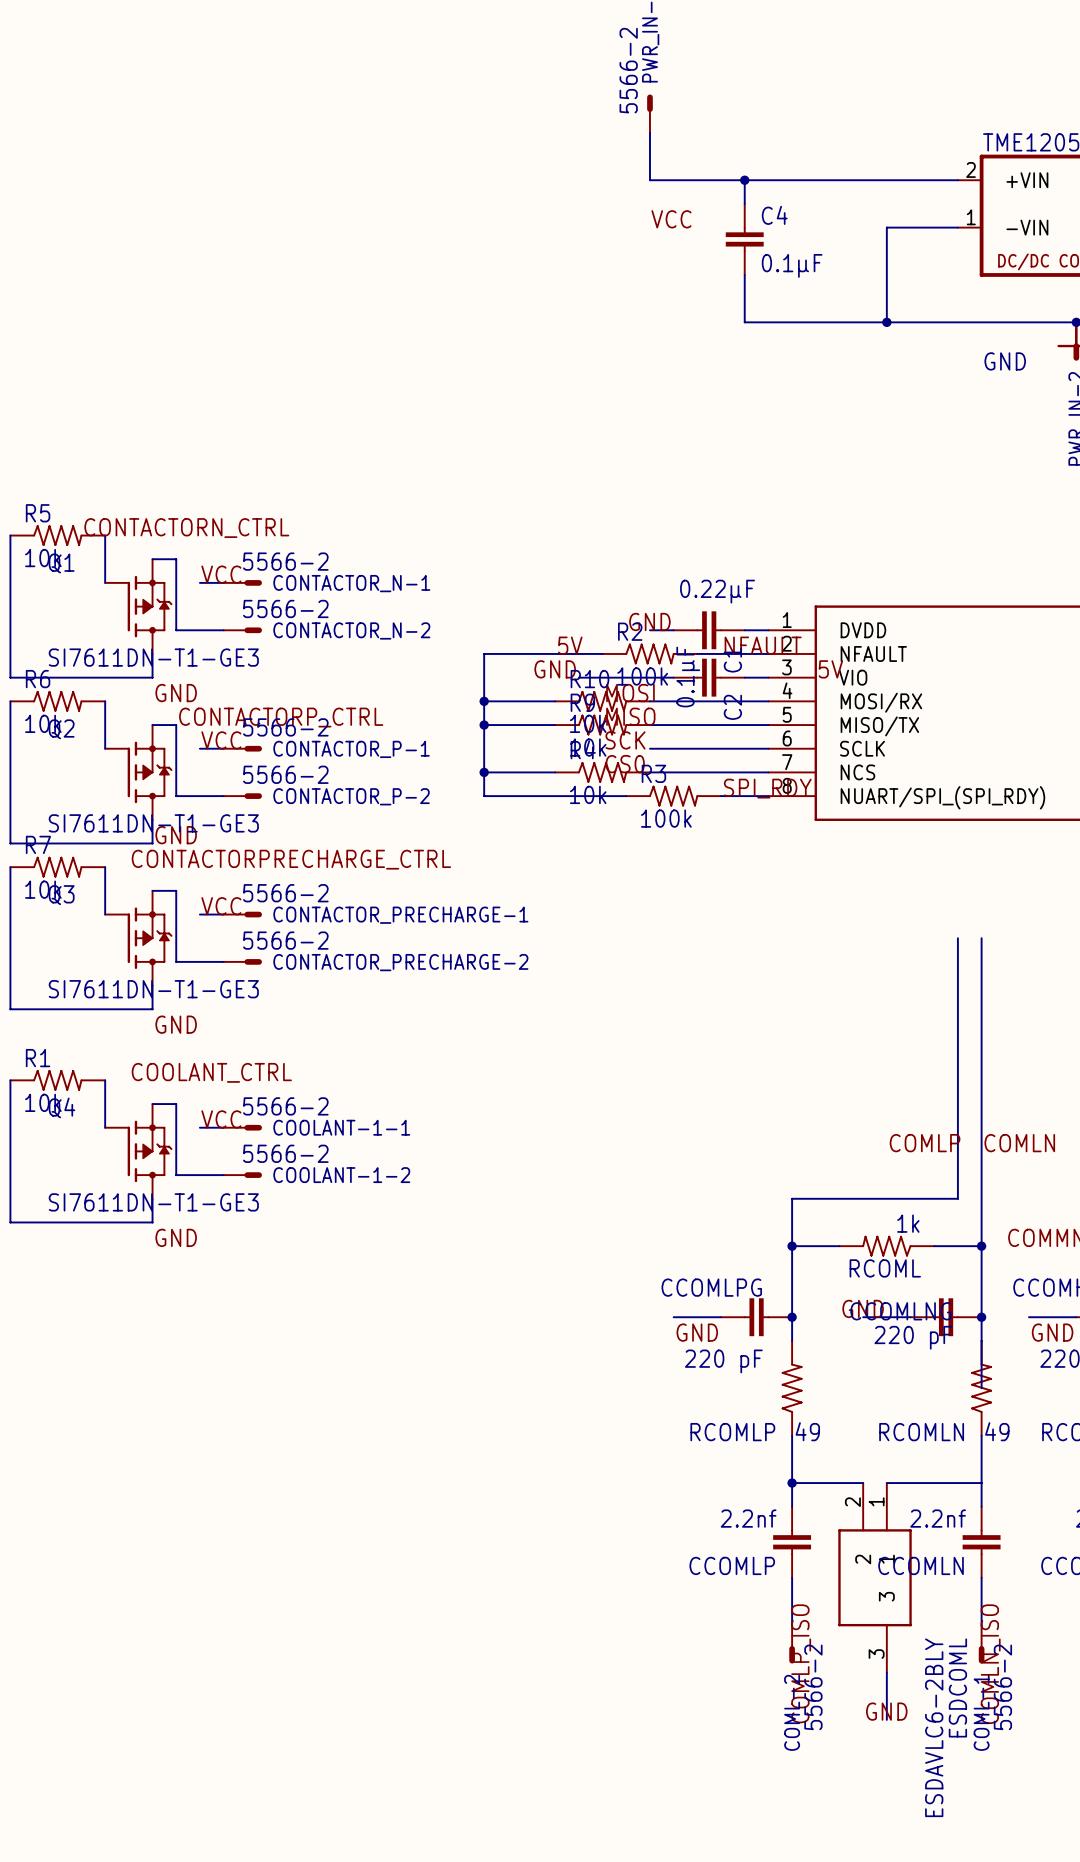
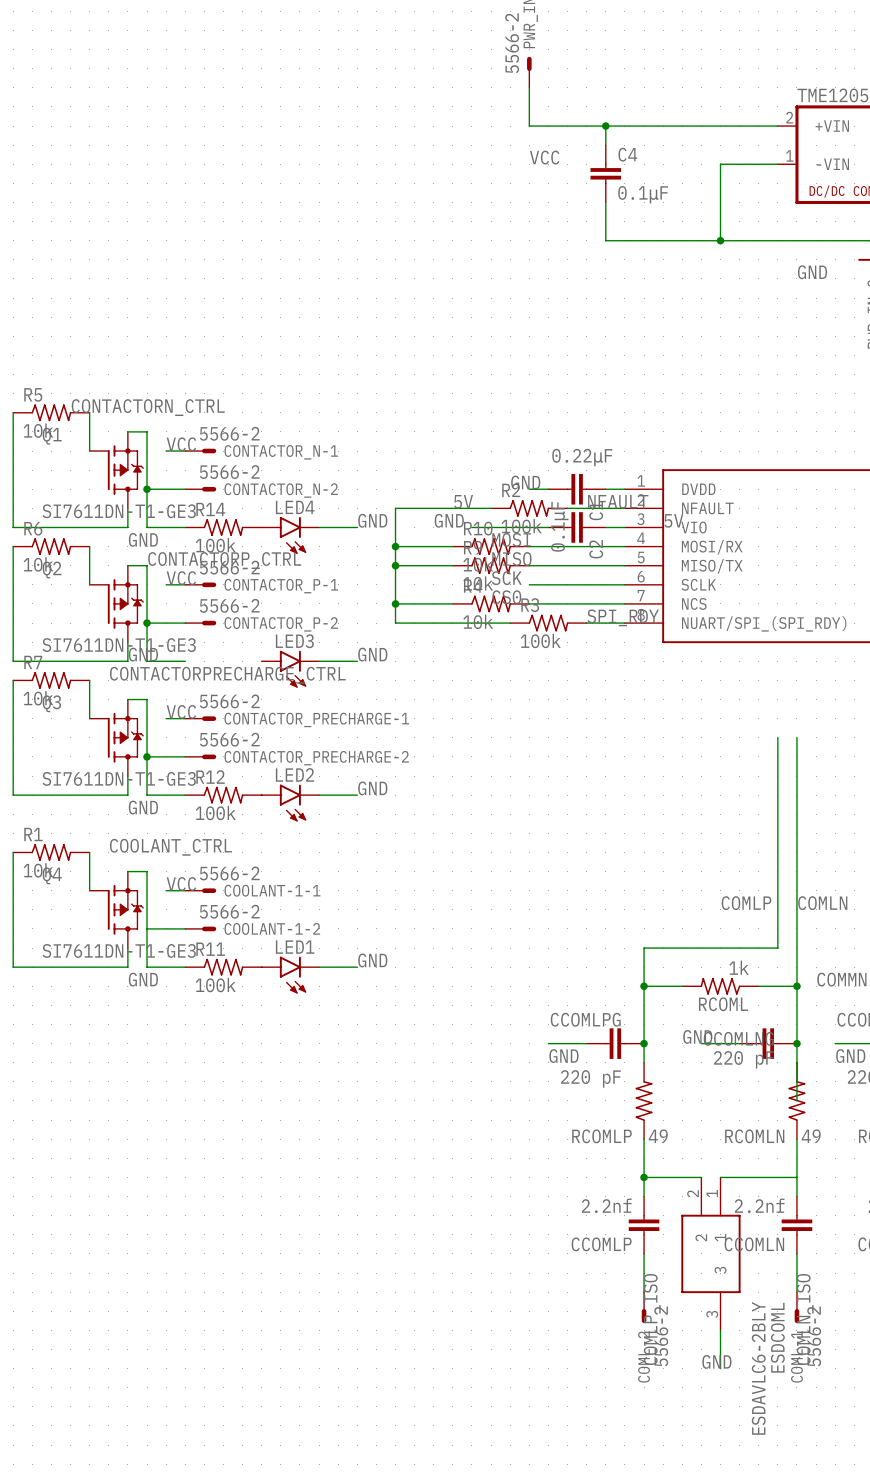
wire: none -> (147, 489) (147, 527) (185, 527)
junction: none -> (147, 489)
label: none -> GND (372, 520)
R14: none -> 100k (223, 527)
wire: none -> (319, 527) (357, 527)
LED4: none -> (290, 535)
wire: none -> (147, 623) (147, 661) (185, 661)
junction: none -> (147, 623)
label: none -> GND (372, 654)
wire: none -> (319, 661) (357, 661)
LED3: none -> (290, 669)
wire: none -> (147, 756) (147, 795) (185, 795)
junction: none -> (147, 756)
label: none -> GND (372, 788)
R12: none -> 100k (223, 795)
wire: none -> (319, 795) (357, 795)
LED2: none -> (290, 803)
wire: none -> (147, 928) (147, 967) (185, 967)
label: none -> GND (372, 960)
R11: none -> 100k (223, 967)
wire: none -> (319, 967) (357, 967)
LED1: none -> (290, 975)

